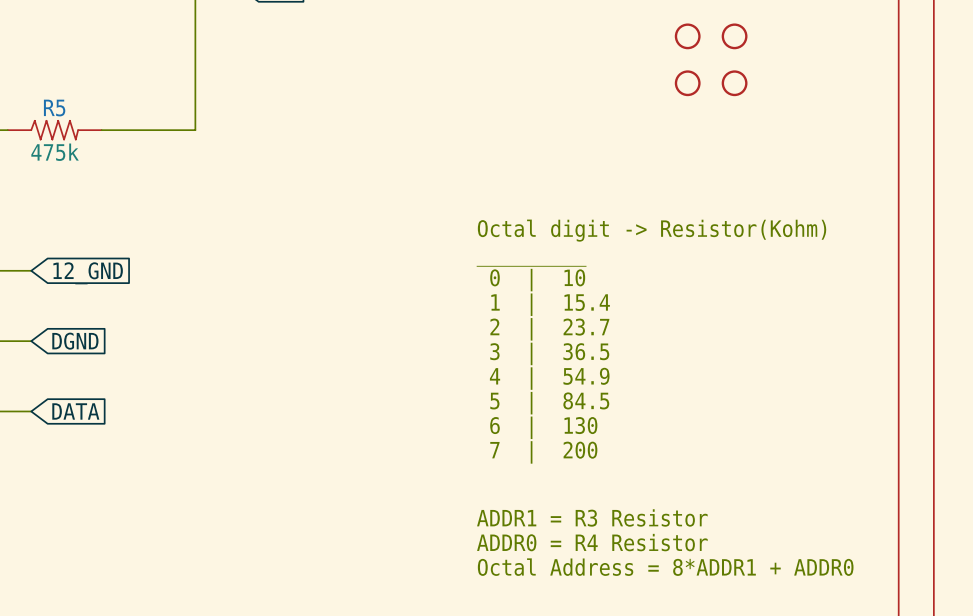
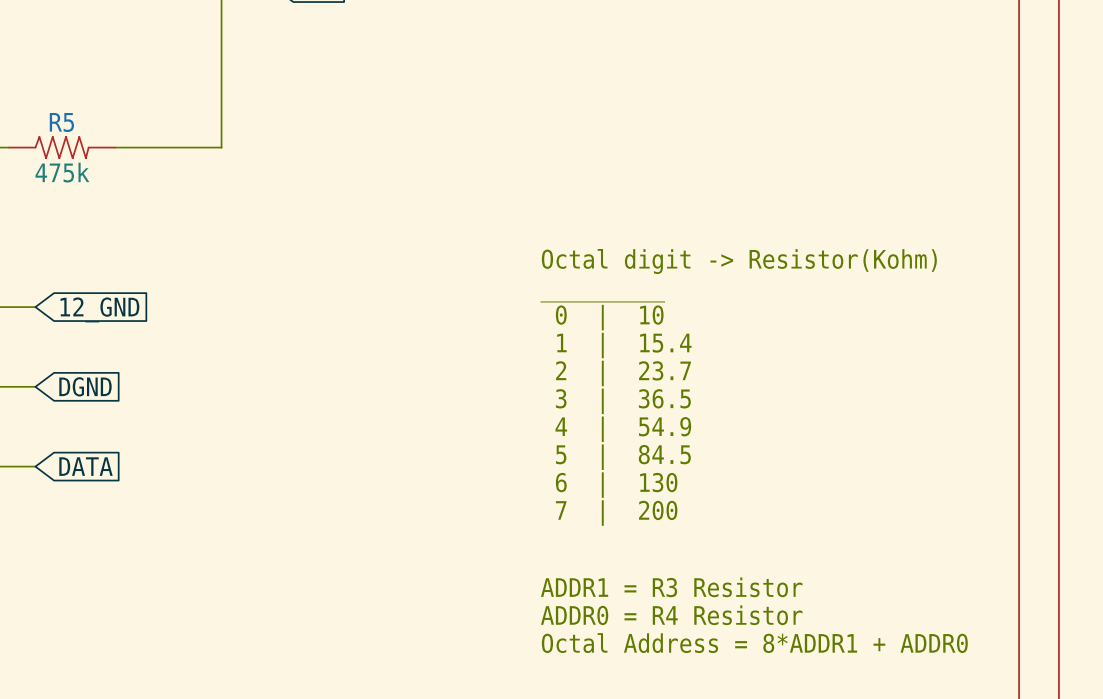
part: (687, 36) -> none
part: (734, 36) -> none
part: (687, 83) -> none
part: (734, 83) -> none

